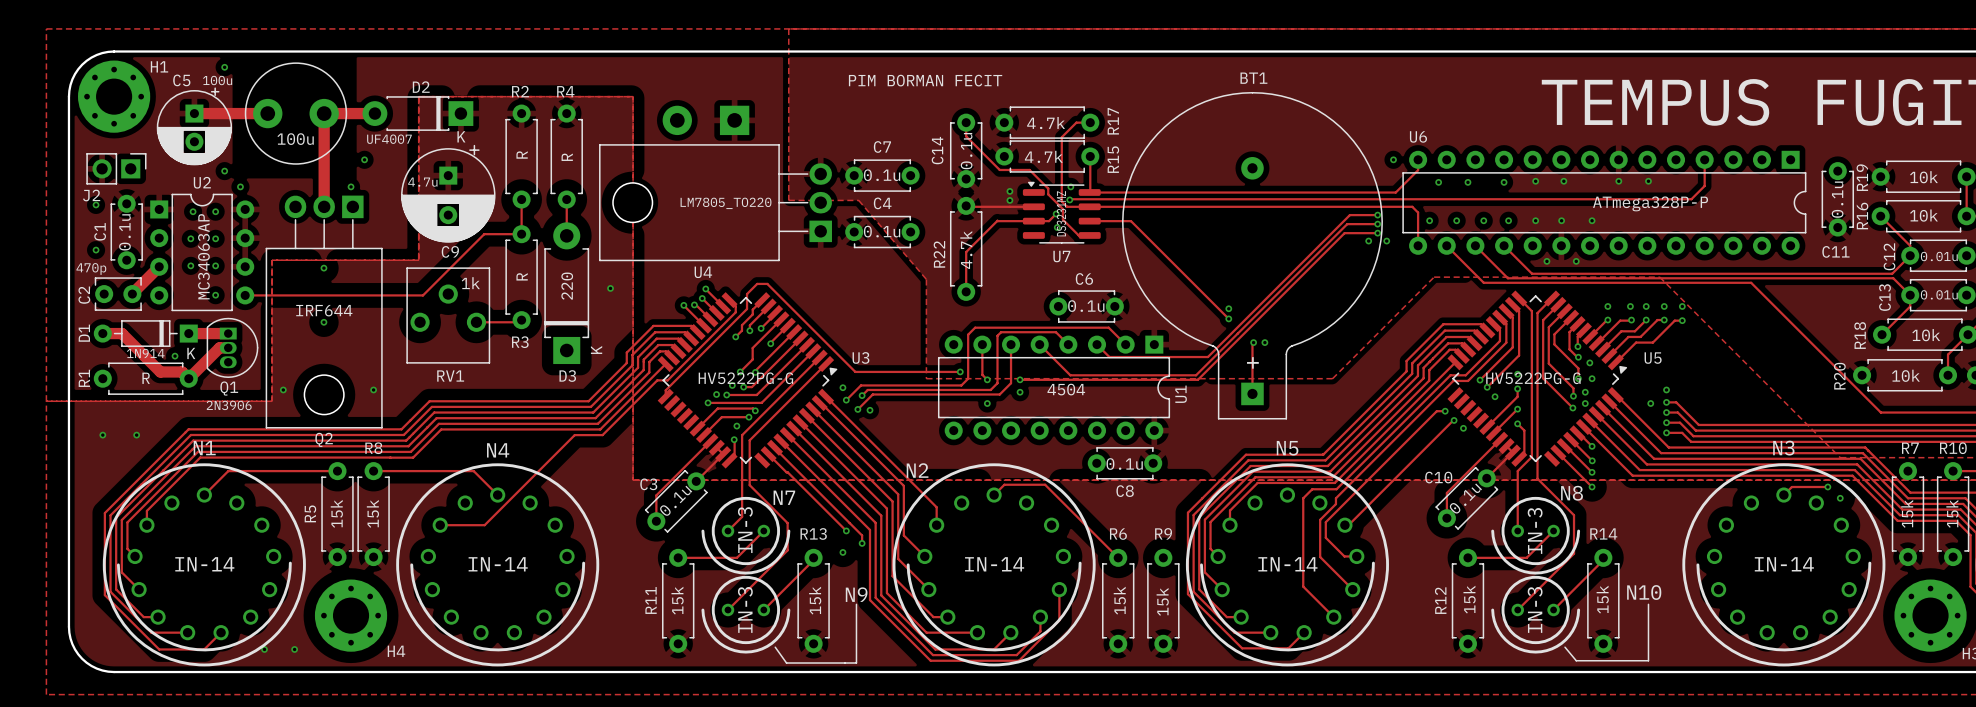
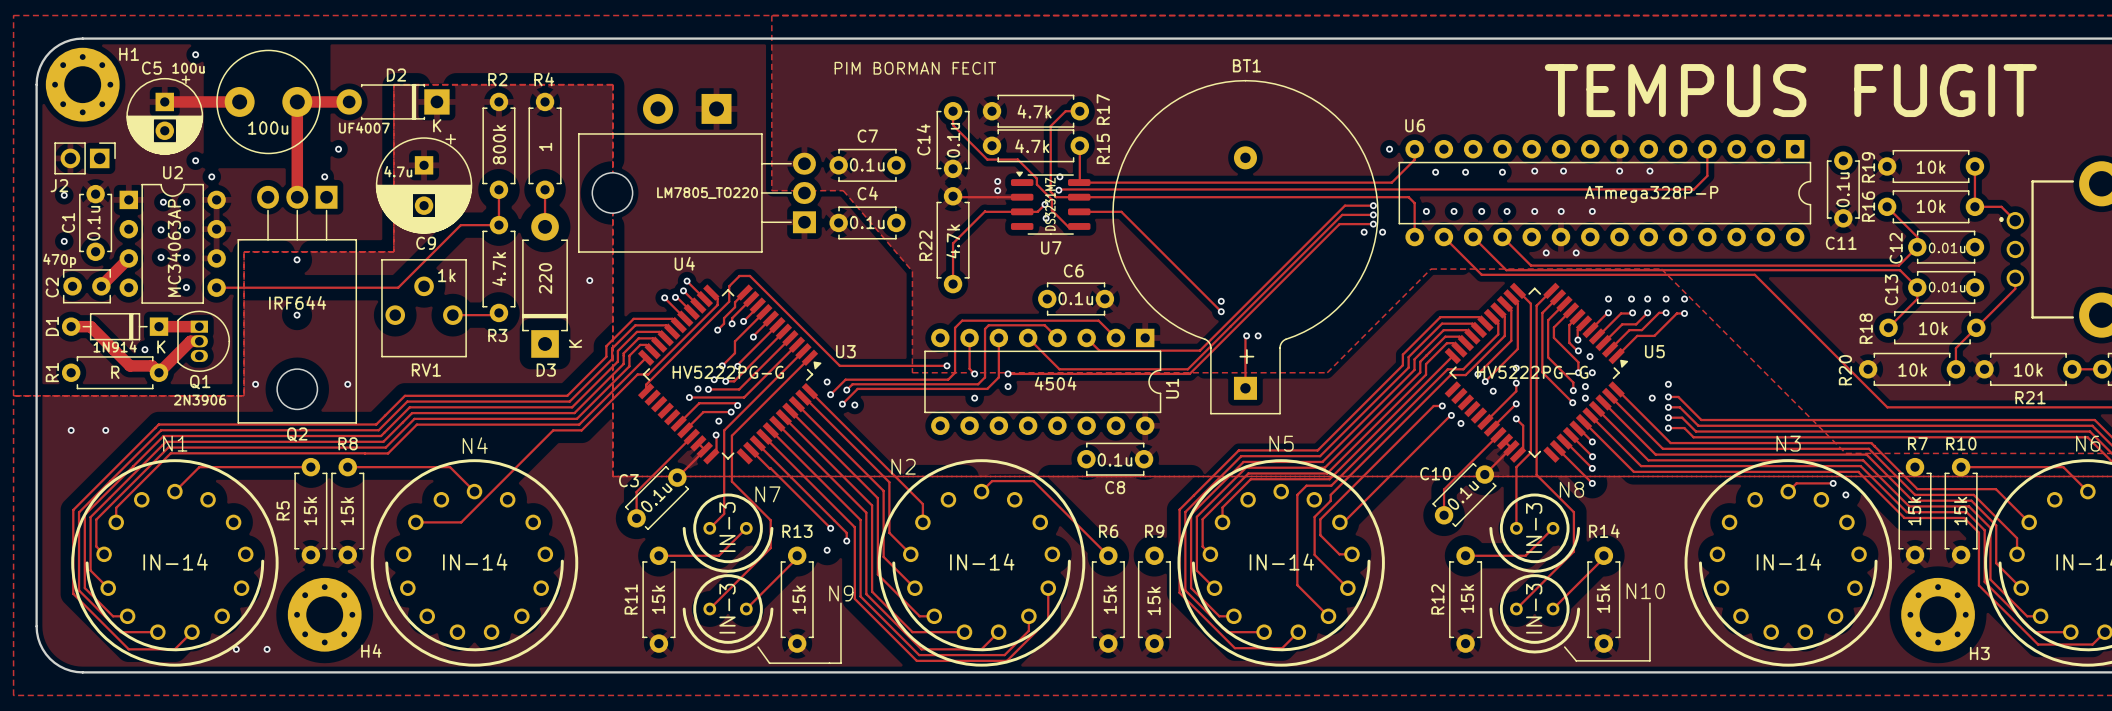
R2 value: R (522, 154) -> 800k (499, 144)
R4 value: R (567, 157) -> 1 (545, 146)
R3 value: R (522, 276) -> 4.7k (499, 269)

